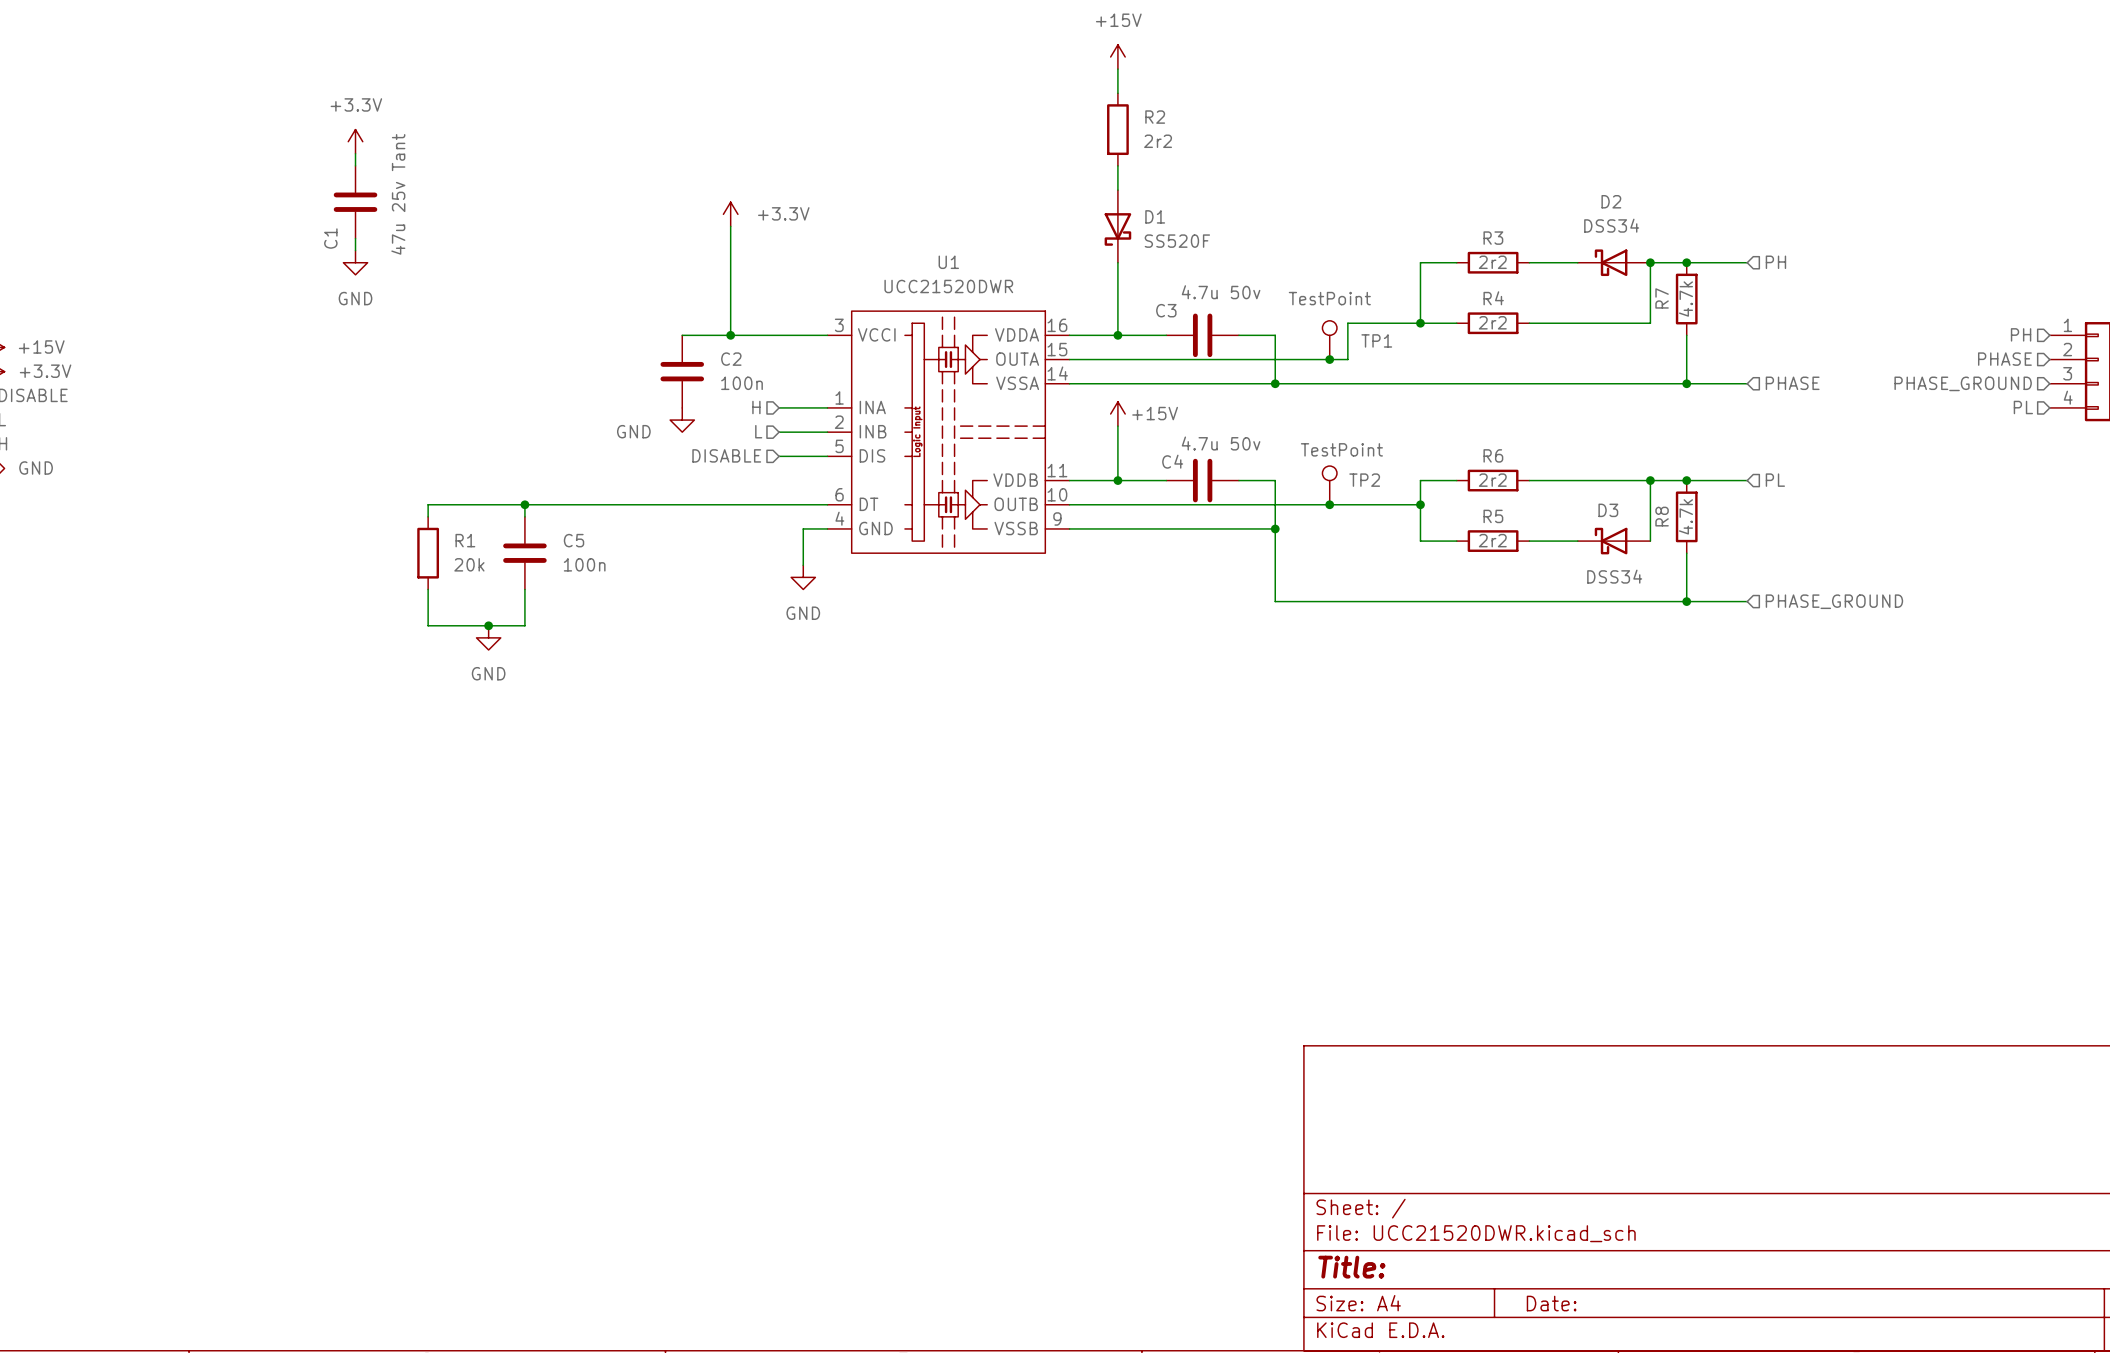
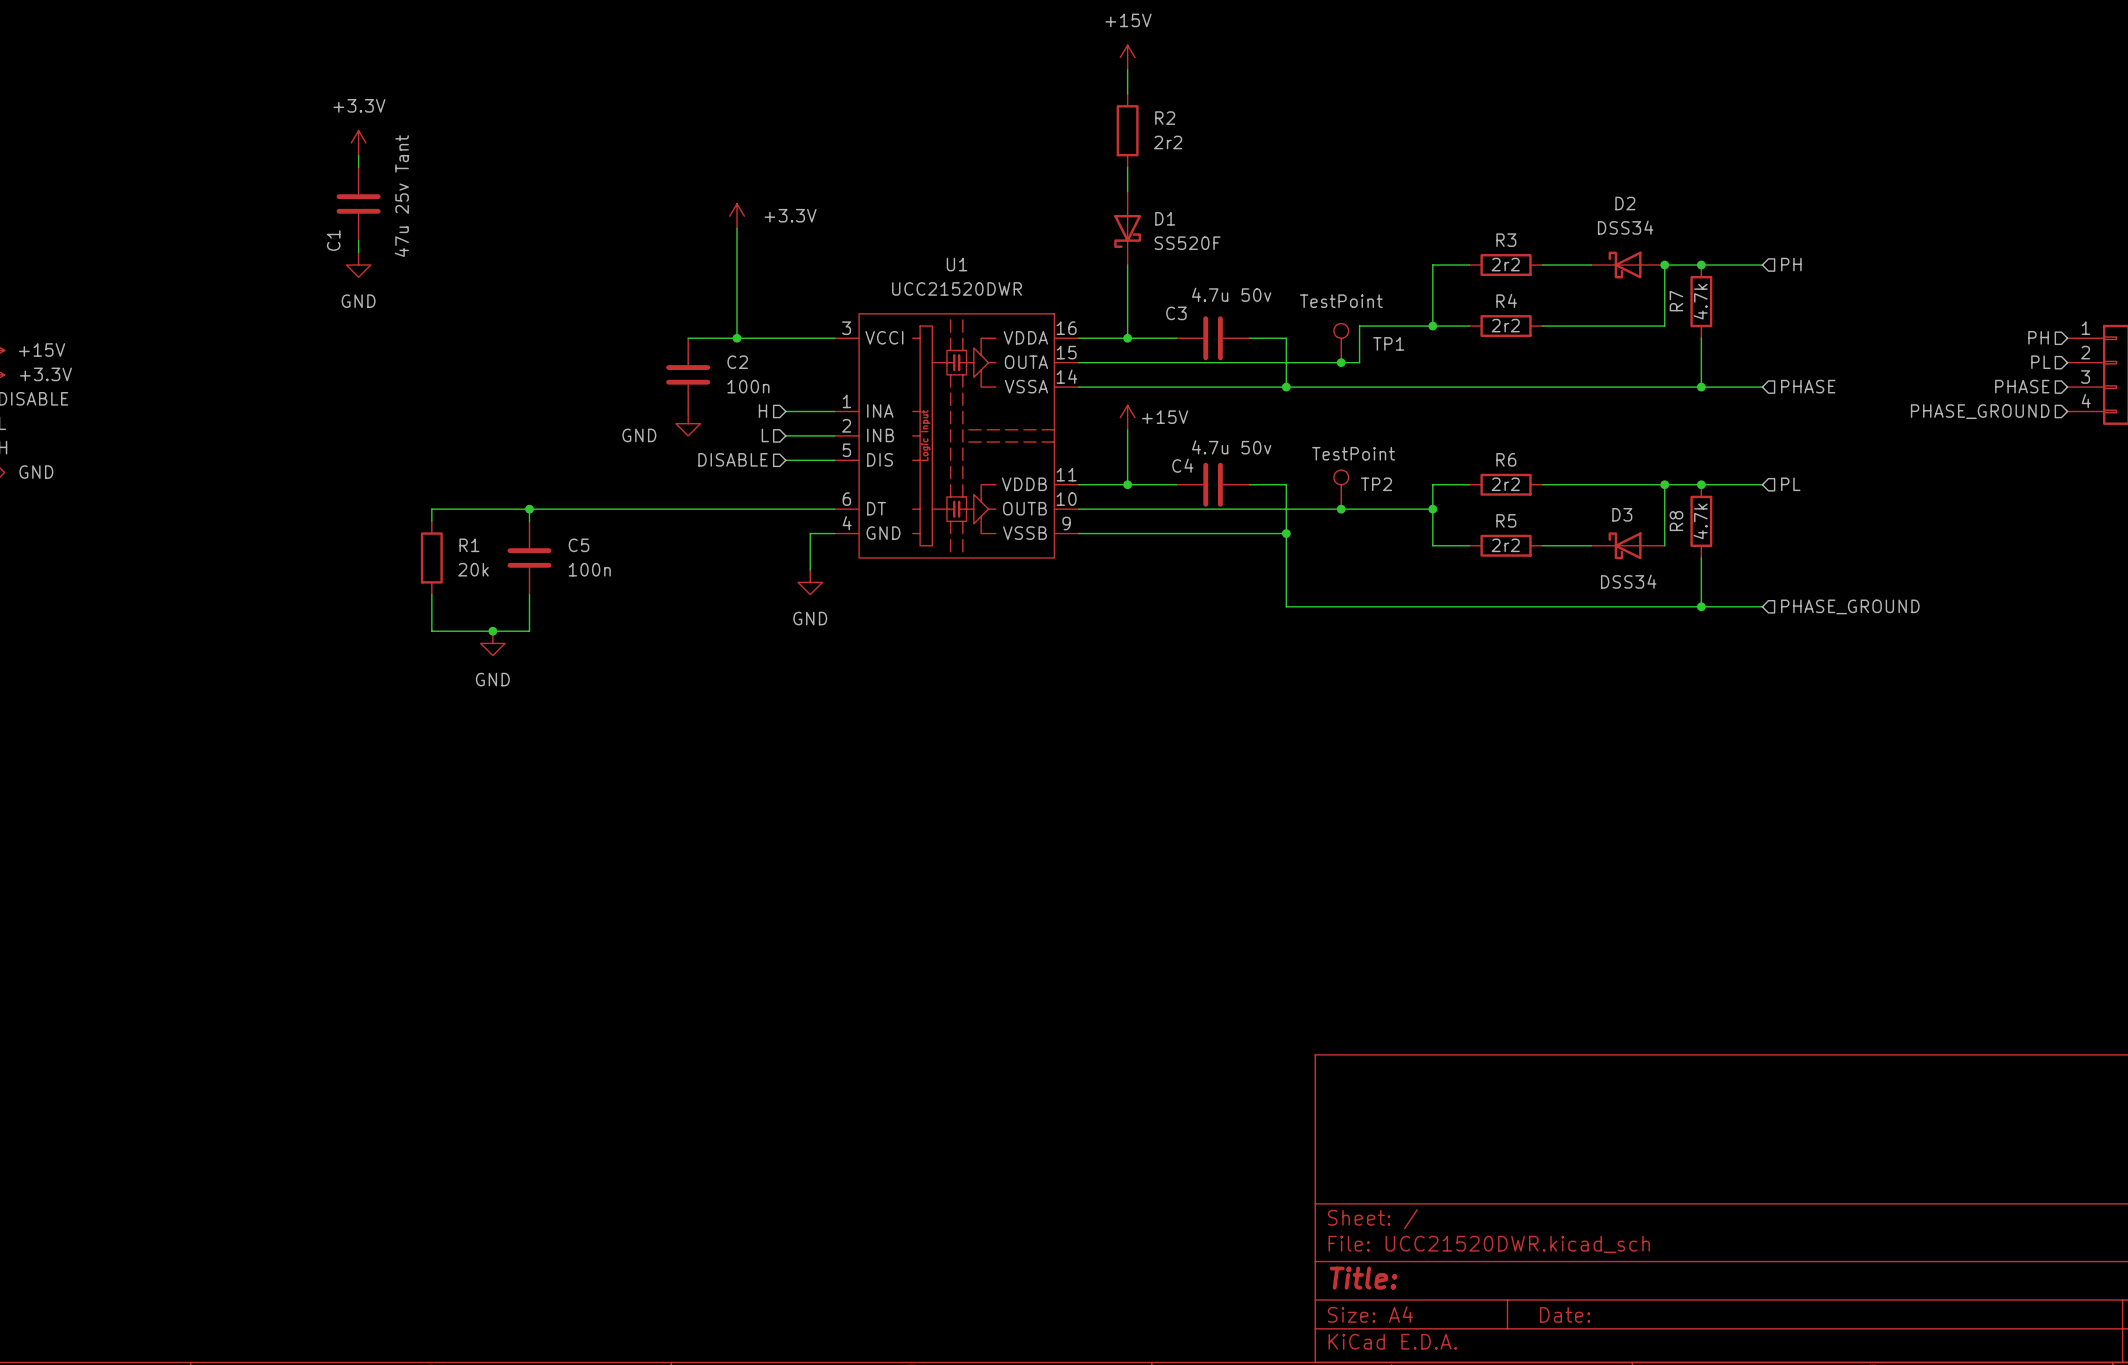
hierarchical label: PHASE (2004, 359) -> PL (2040, 362)
hierarchical label: PHASE_GROUND (1963, 383) -> PHASE (2022, 386)
hierarchical label: PL (2023, 407) -> PHASE_GROUND (1980, 411)

